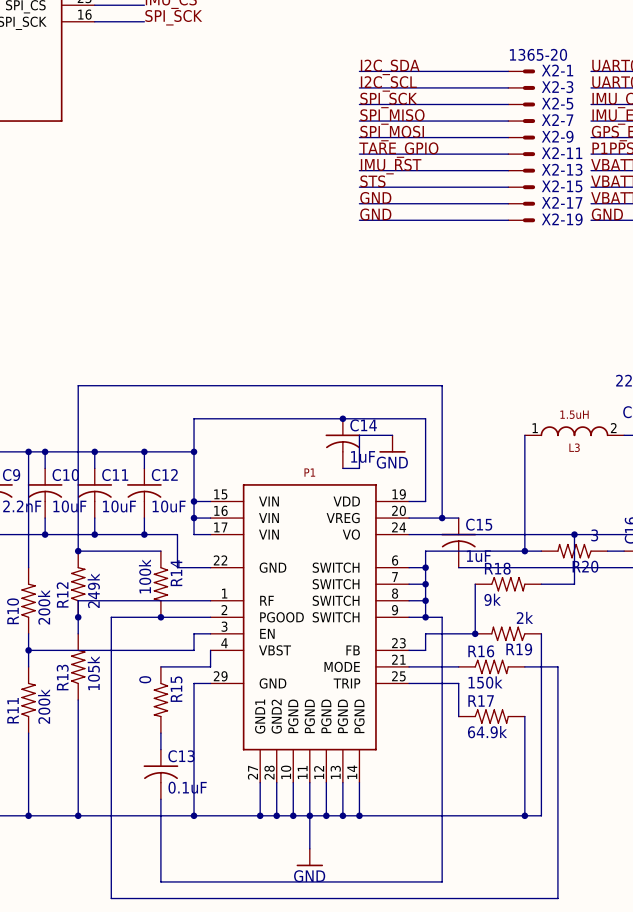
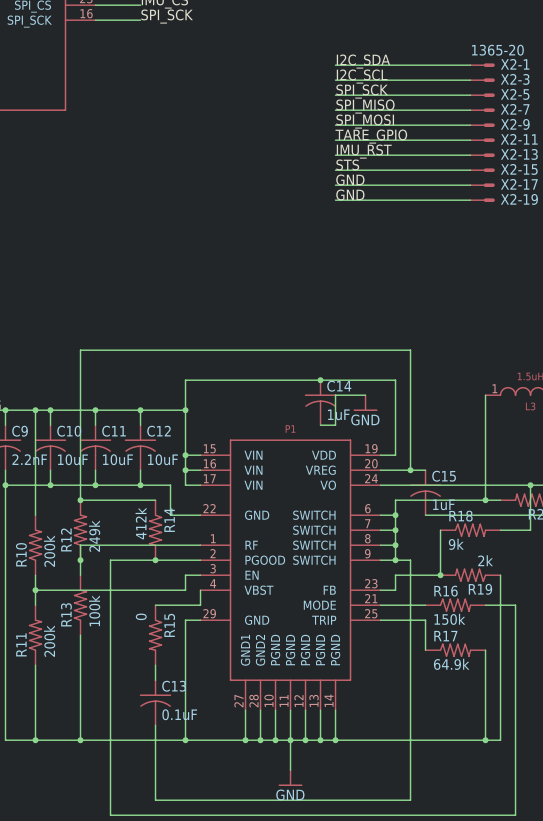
R14 value: 100k (145, 576) -> 412k (141, 523)
R13 value: 105k (93, 673) -> 100k (94, 610)

